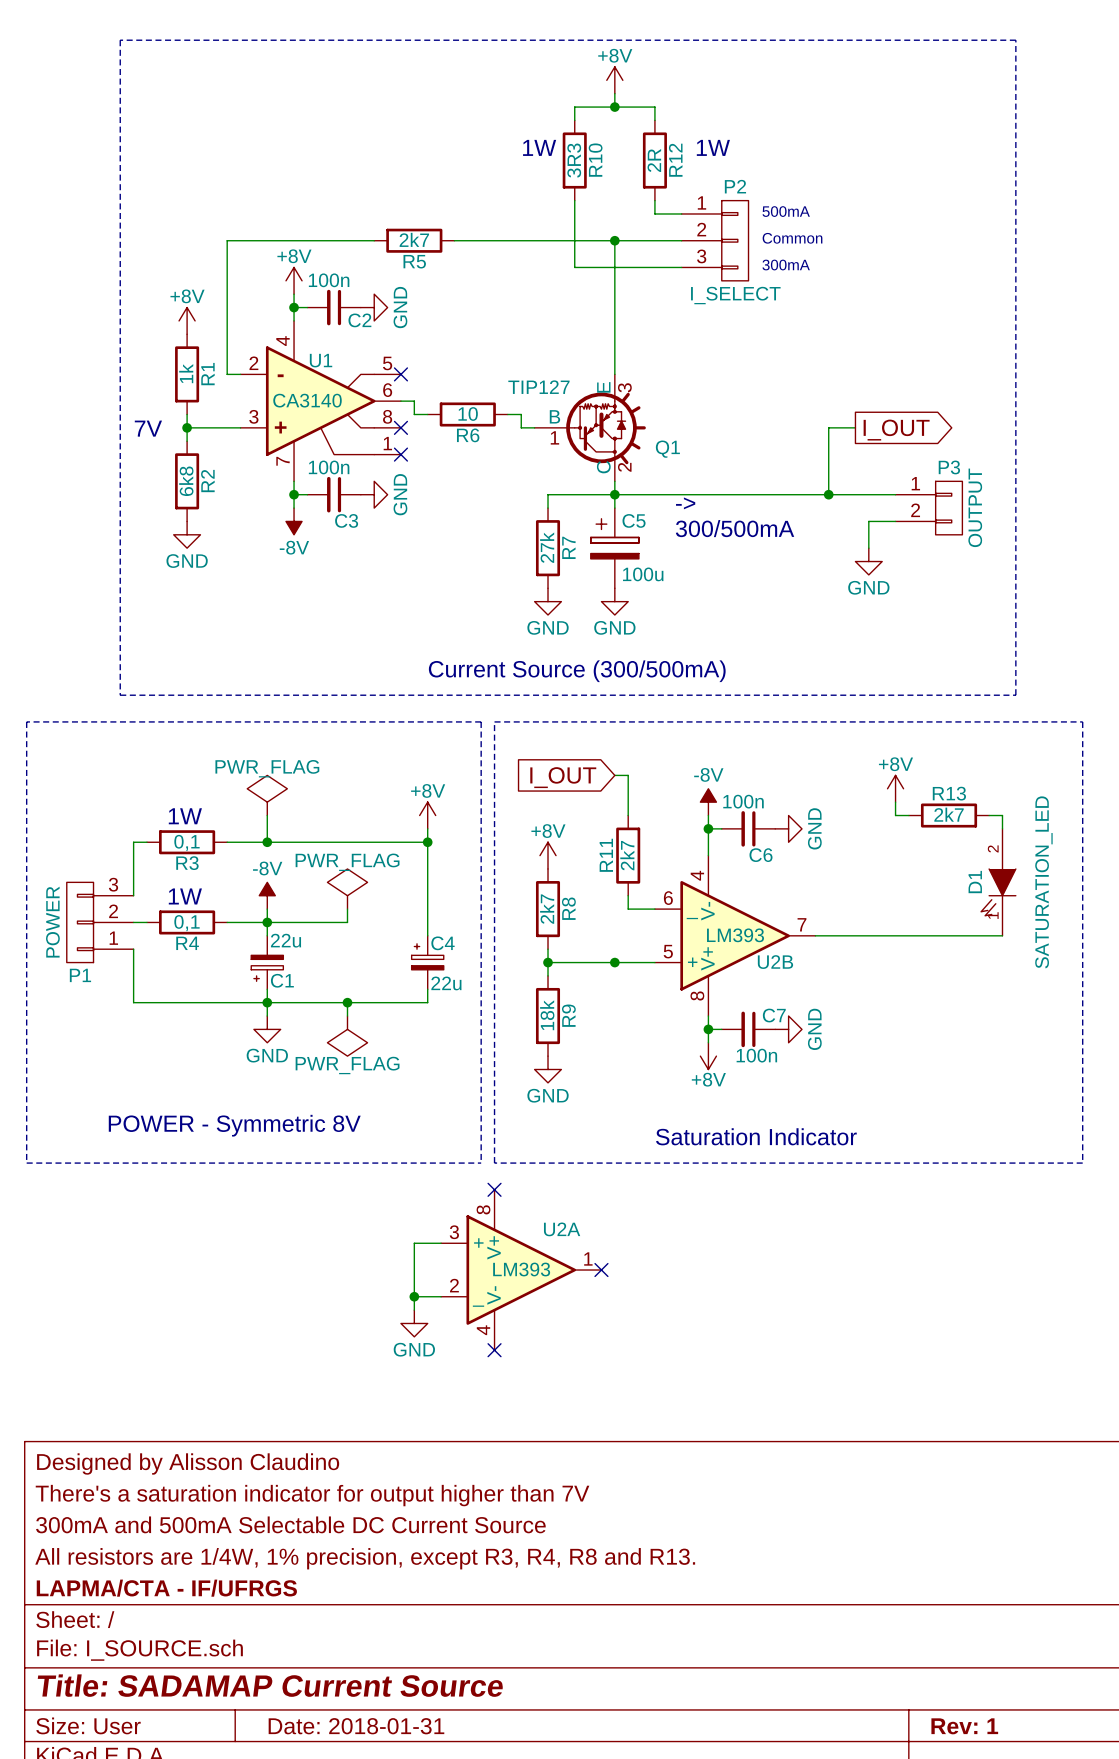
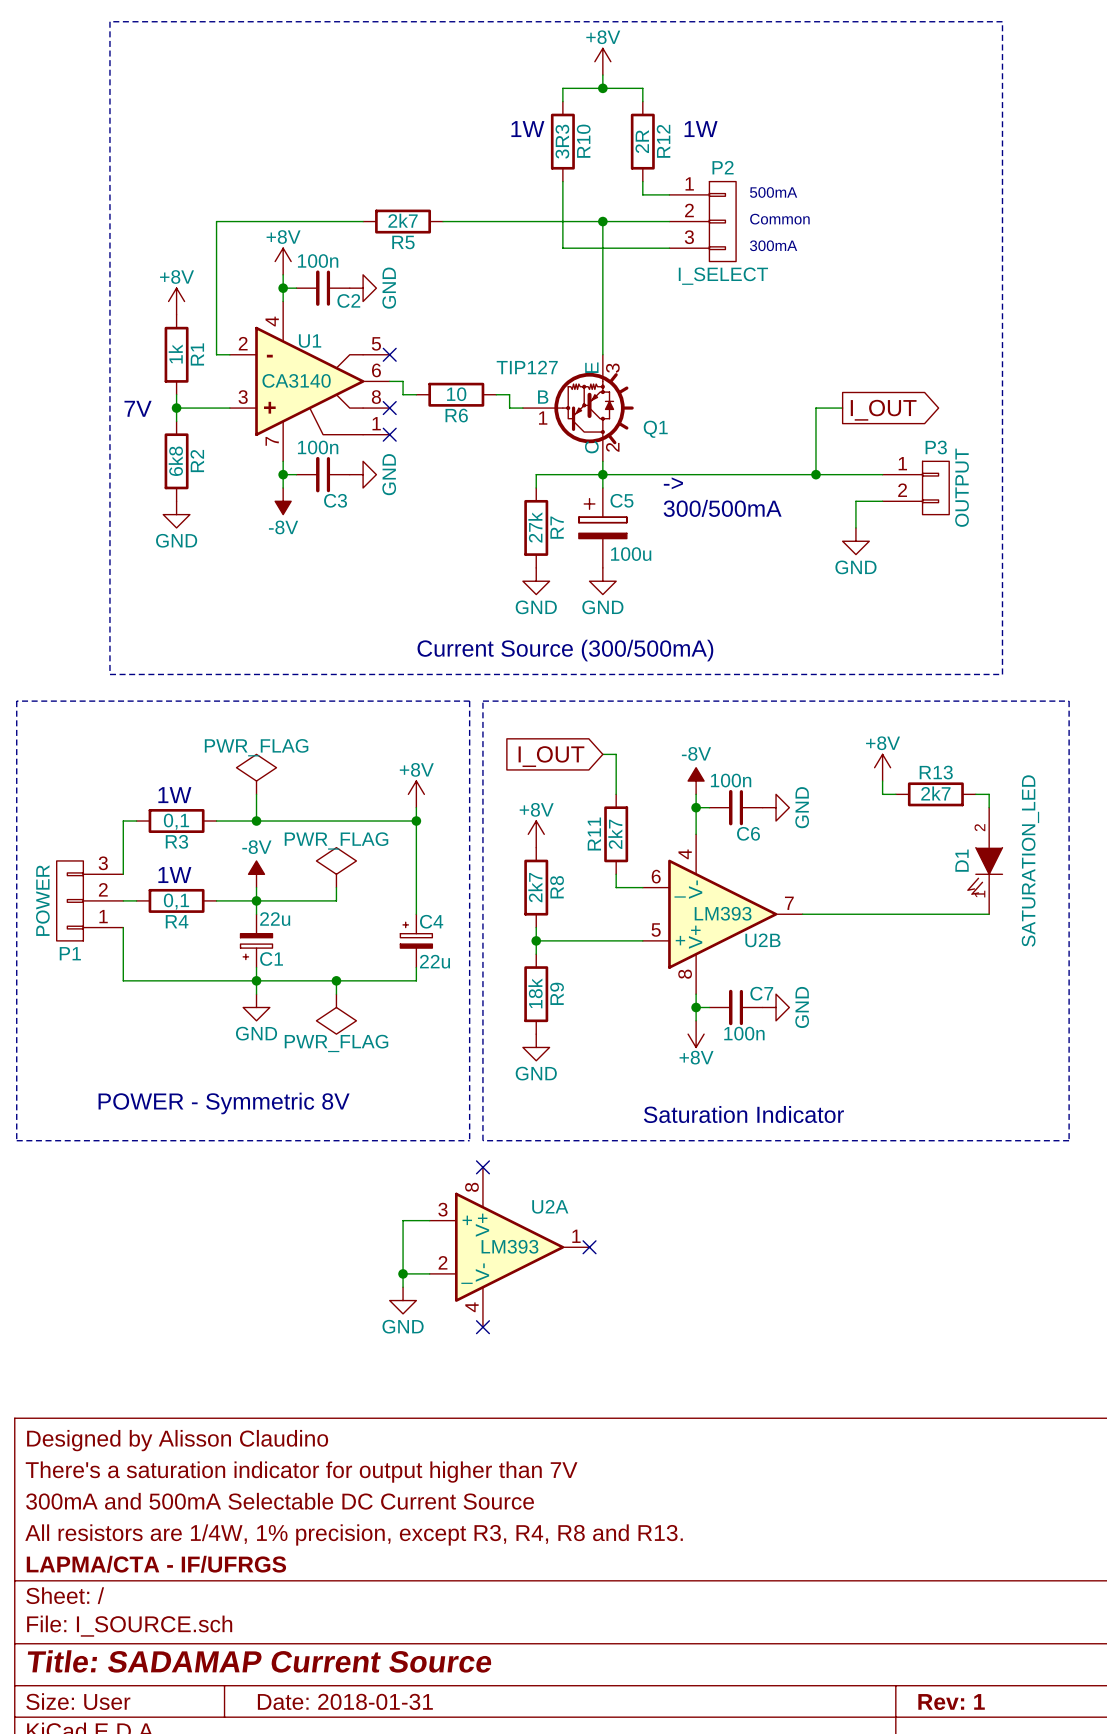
junction: (614, 962) -> none

